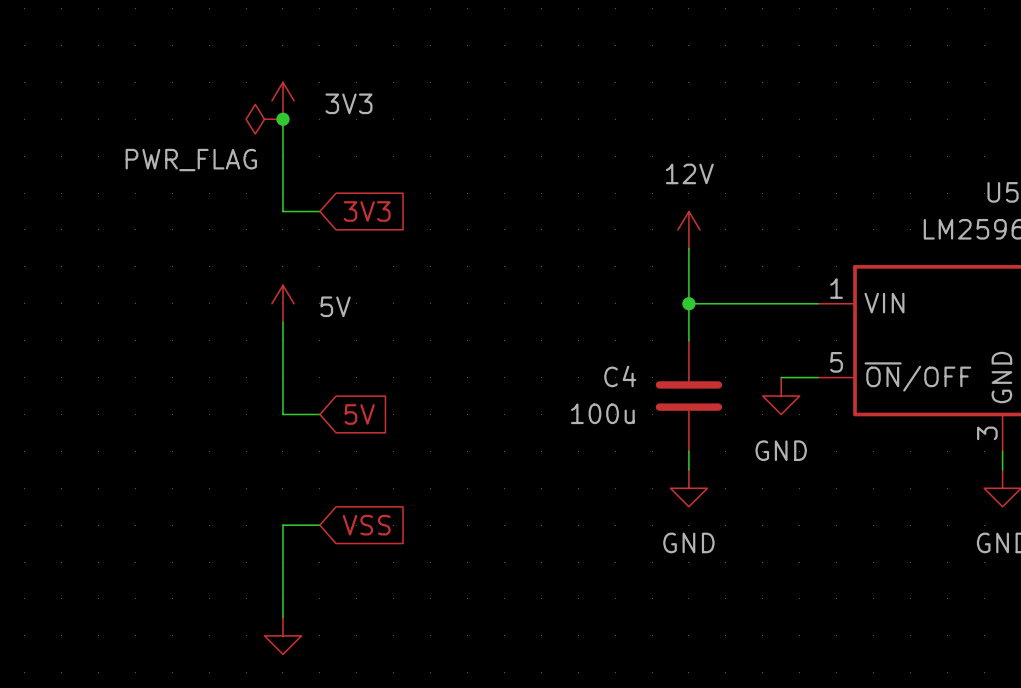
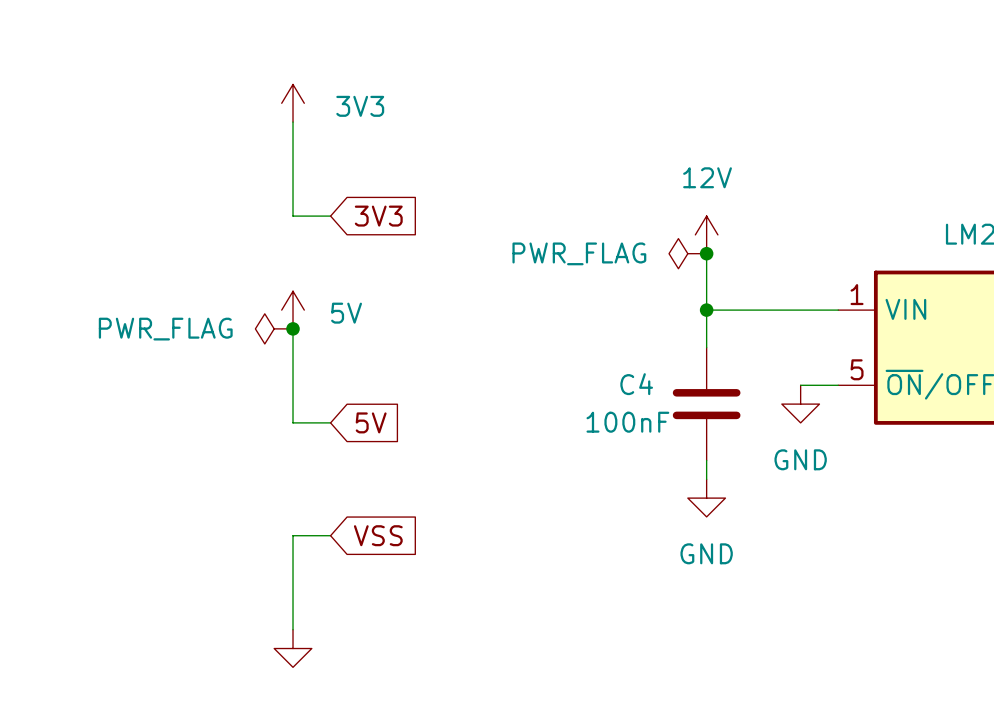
power symbol position: PWR_FLAG (264, 119) -> PWR_FLAG (274, 328)
junction: (282, 119) -> none
power symbol text position: PWR_FLAG (191, 160) -> PWR_FLAG (165, 329)
power symbol: none -> PWR_FLAG (687, 253)
junction: none -> (706, 253)
junction: none -> (293, 328)
C4 value: 100u (602, 413) -> 100nF (627, 422)

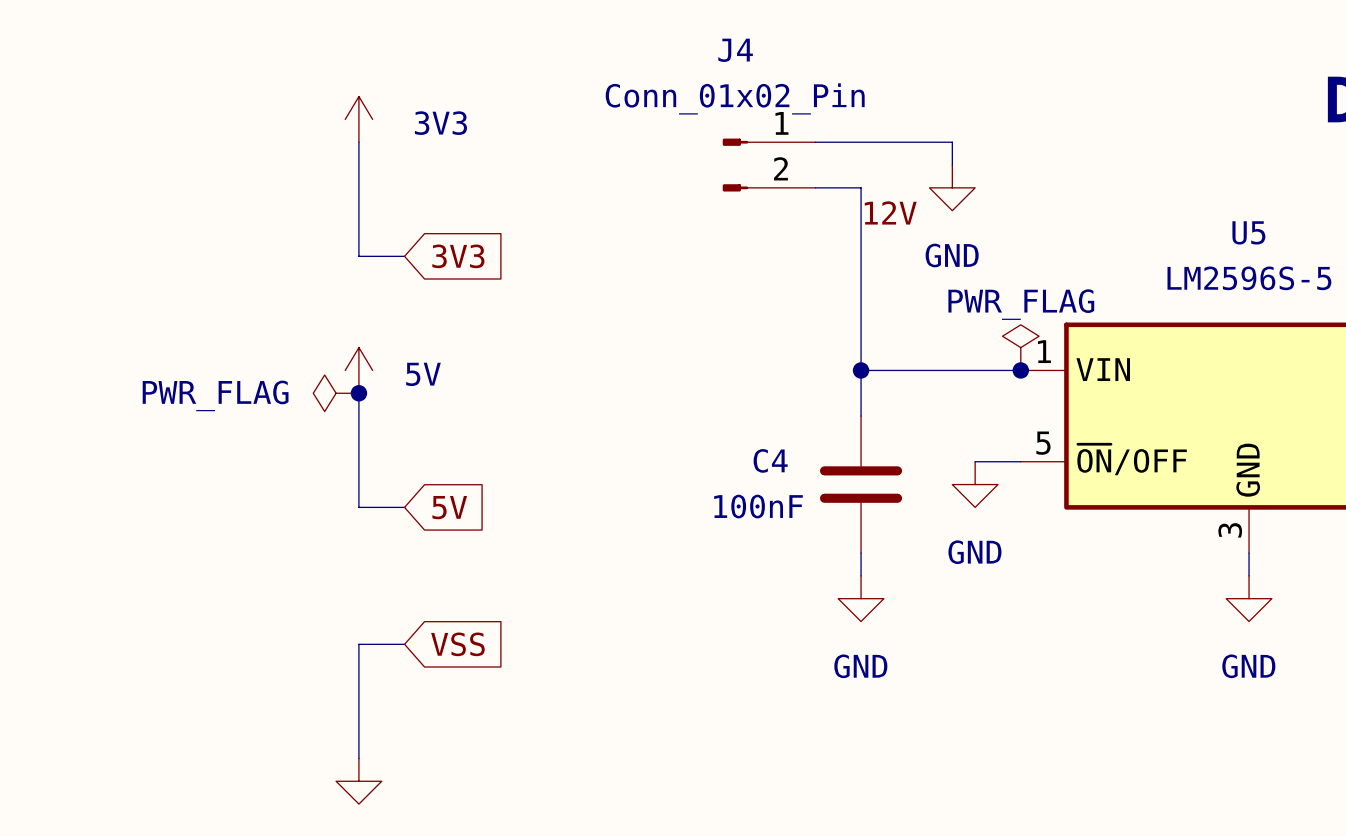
wire: none -> (815, 142) (952, 142) (952, 165)
J4: none -> Conn_01x02_Pin (769, 165)
wire: none -> (815, 187) (861, 187) (861, 301)
power symbol: none -> GND (952, 187)
label: none -> 12V (890, 212)
power symbol: 12V (706, 234) -> none
power symbol text position: PWR_FLAG (579, 253) -> PWR_FLAG (1021, 304)
power symbol rotation: 0° (687, 253) -> 90° clockwise (1020, 347)
power symbol position: PWR_FLAG (687, 253) -> PWR_FLAG (1020, 347)
junction: (706, 253) -> none
junction: none -> (1020, 370)

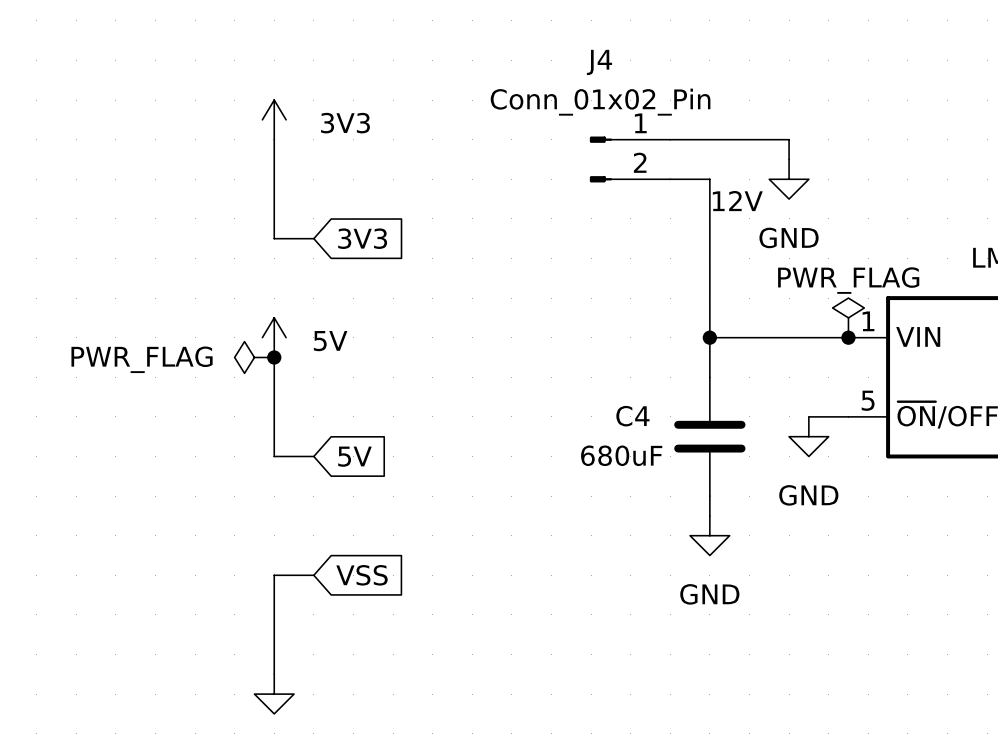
C4 value: 100nF (758, 506) -> 680uF (621, 455)

